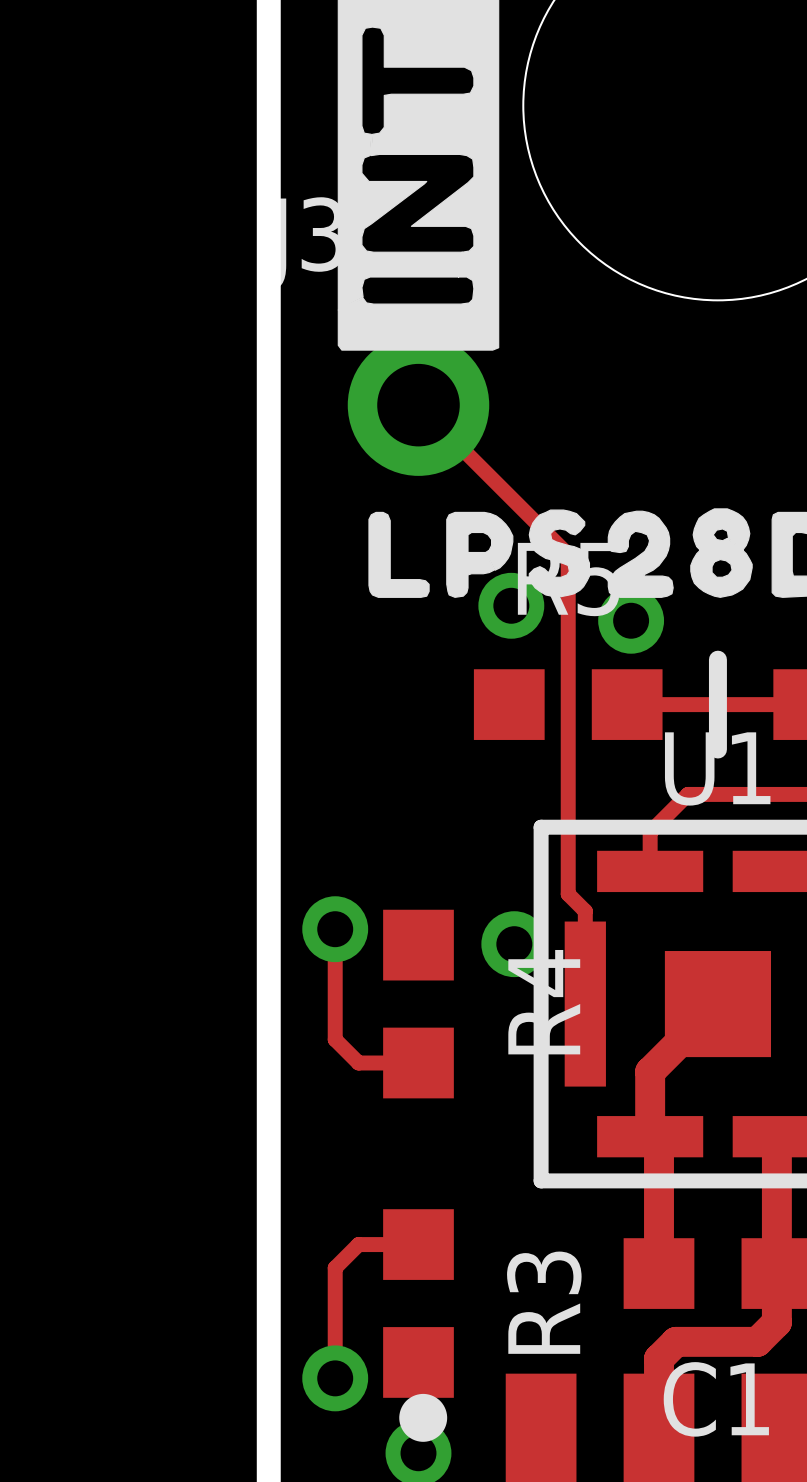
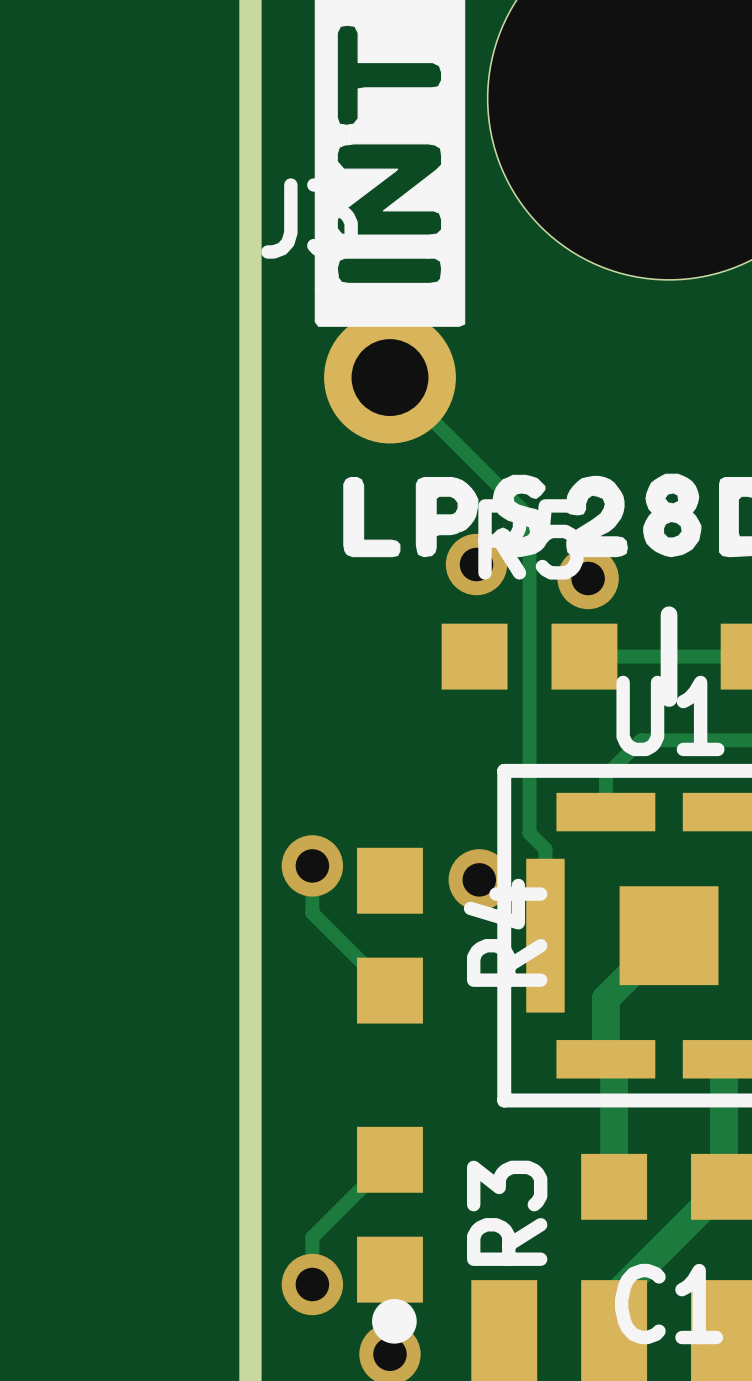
track: (335, 979) (335, 1039) (358, 1063) (418, 1063) -> (312, 913) (389, 990)
track: (418, 1244) (358, 1244) (335, 1267) (335, 1327) -> (389, 1159) (312, 1237)
track: (776, 1273) (776, 1322) (757, 1341) (676, 1341) (659, 1358) (659, 1391) -> (723, 1186) (614, 1296)

